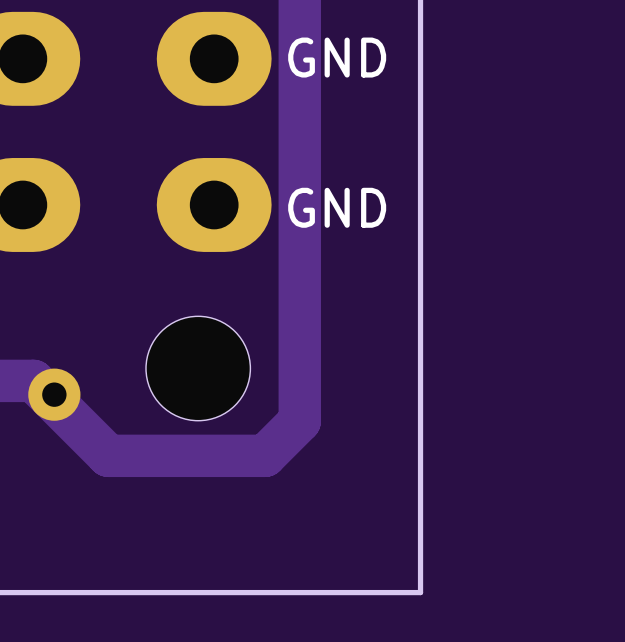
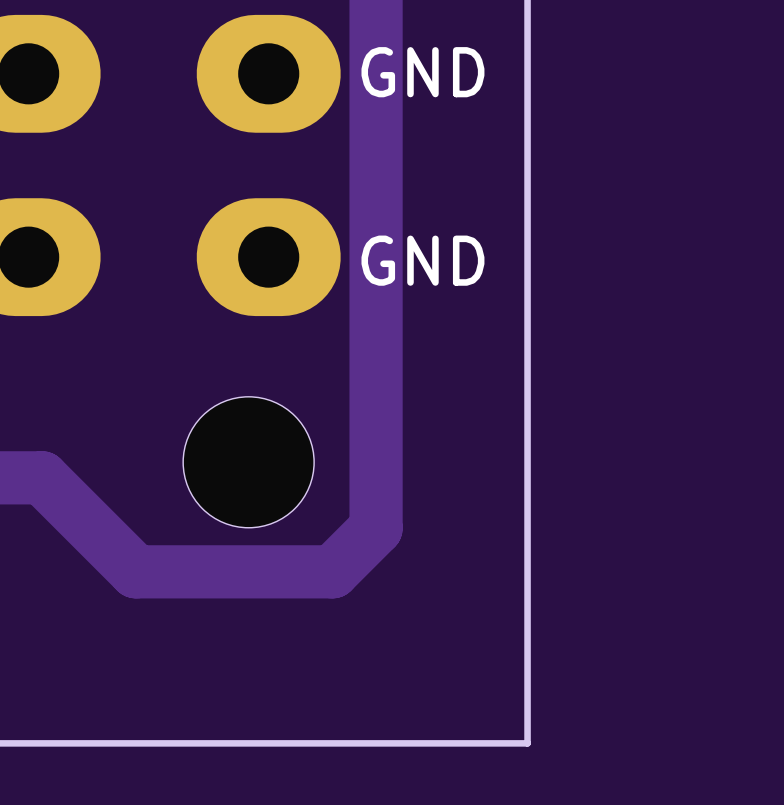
part: (54, 394) -> none

